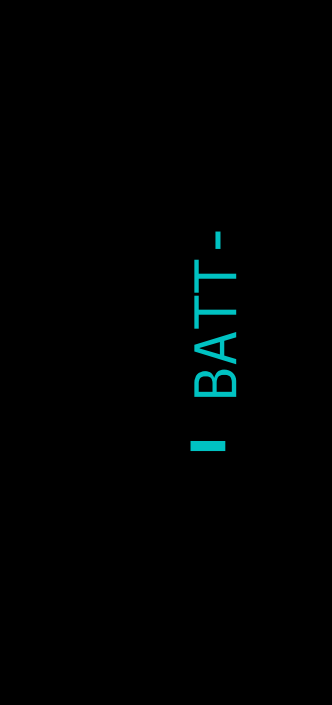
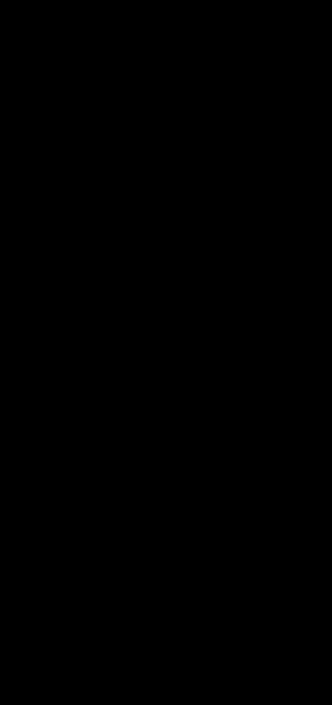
text: BATT- (215, 314) -> none
text: - (207, 446) -> none

